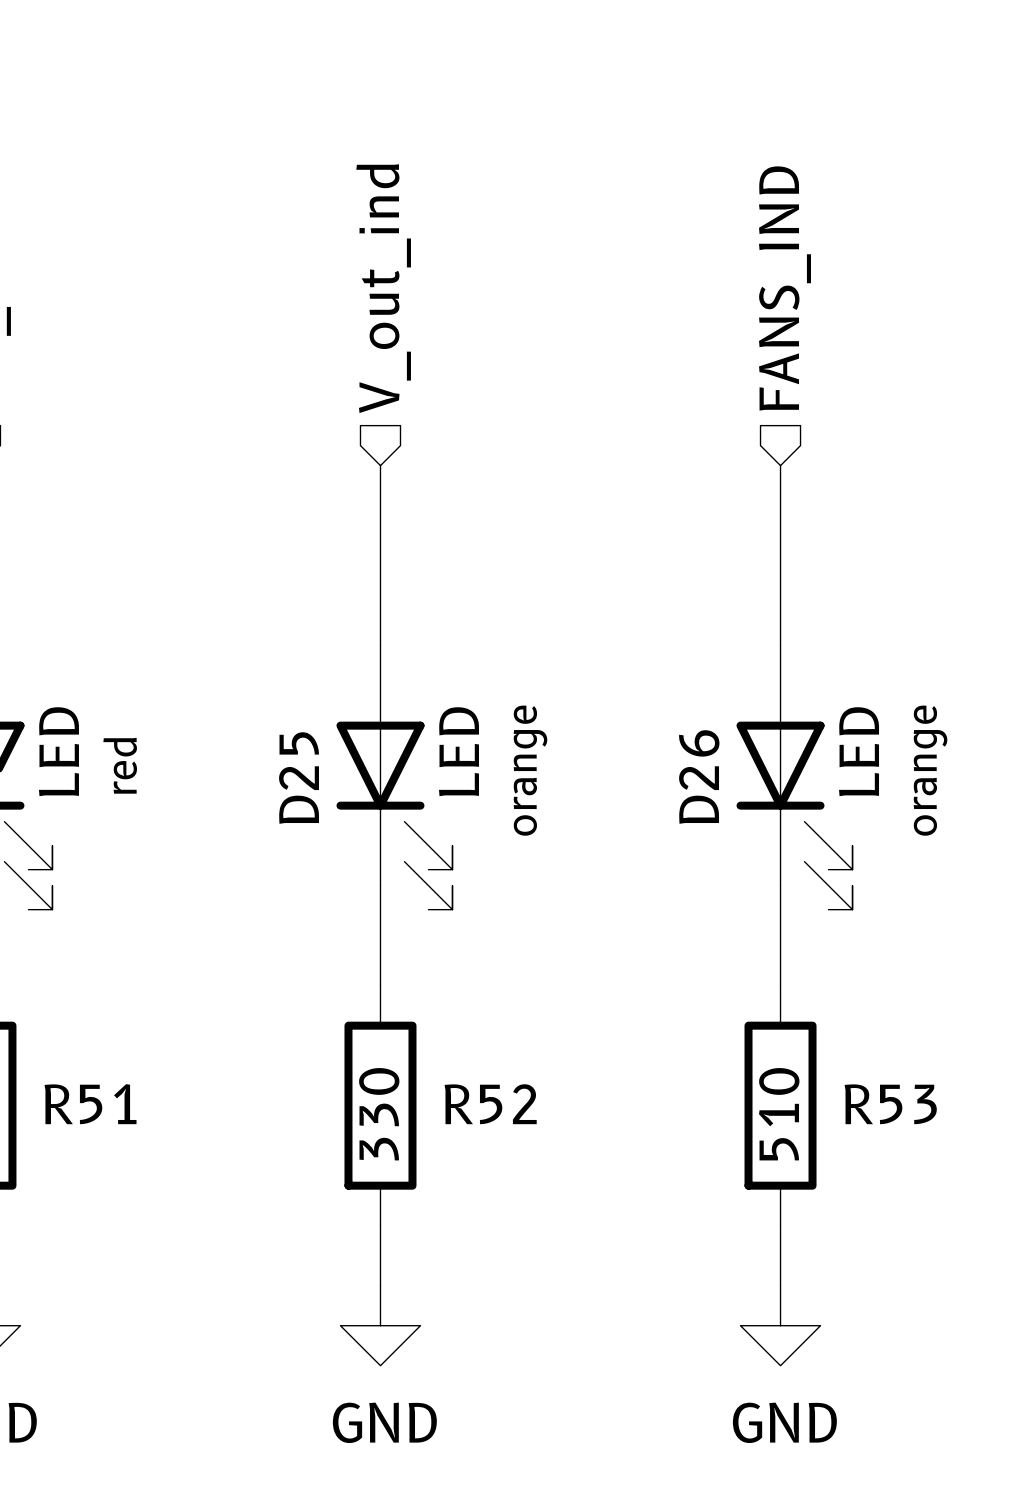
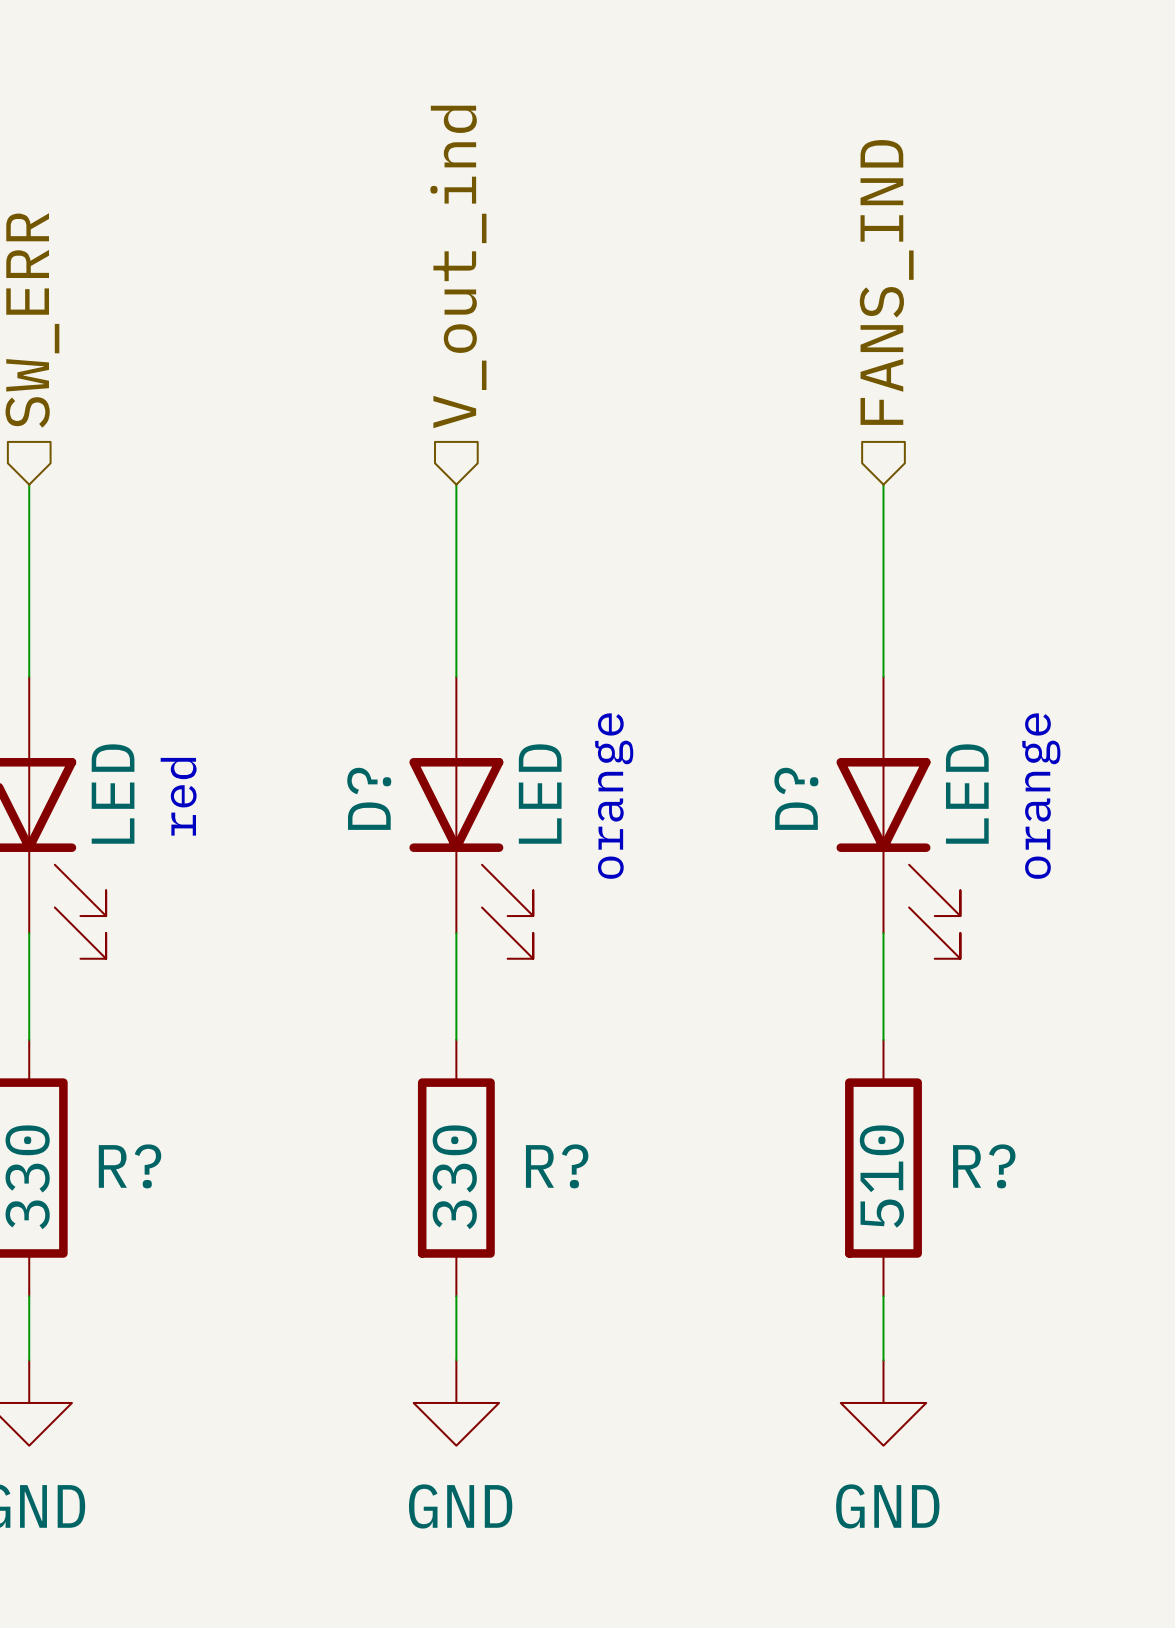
D26 name: D26 (699, 777) -> D? (796, 798)
D25 name: D25 (299, 778) -> D? (369, 798)
R51 name: R51 (90, 1104) -> R? (130, 1166)
R52 name: R52 (490, 1104) -> R? (557, 1166)
R53 name: R53 (890, 1104) -> R? (984, 1166)

